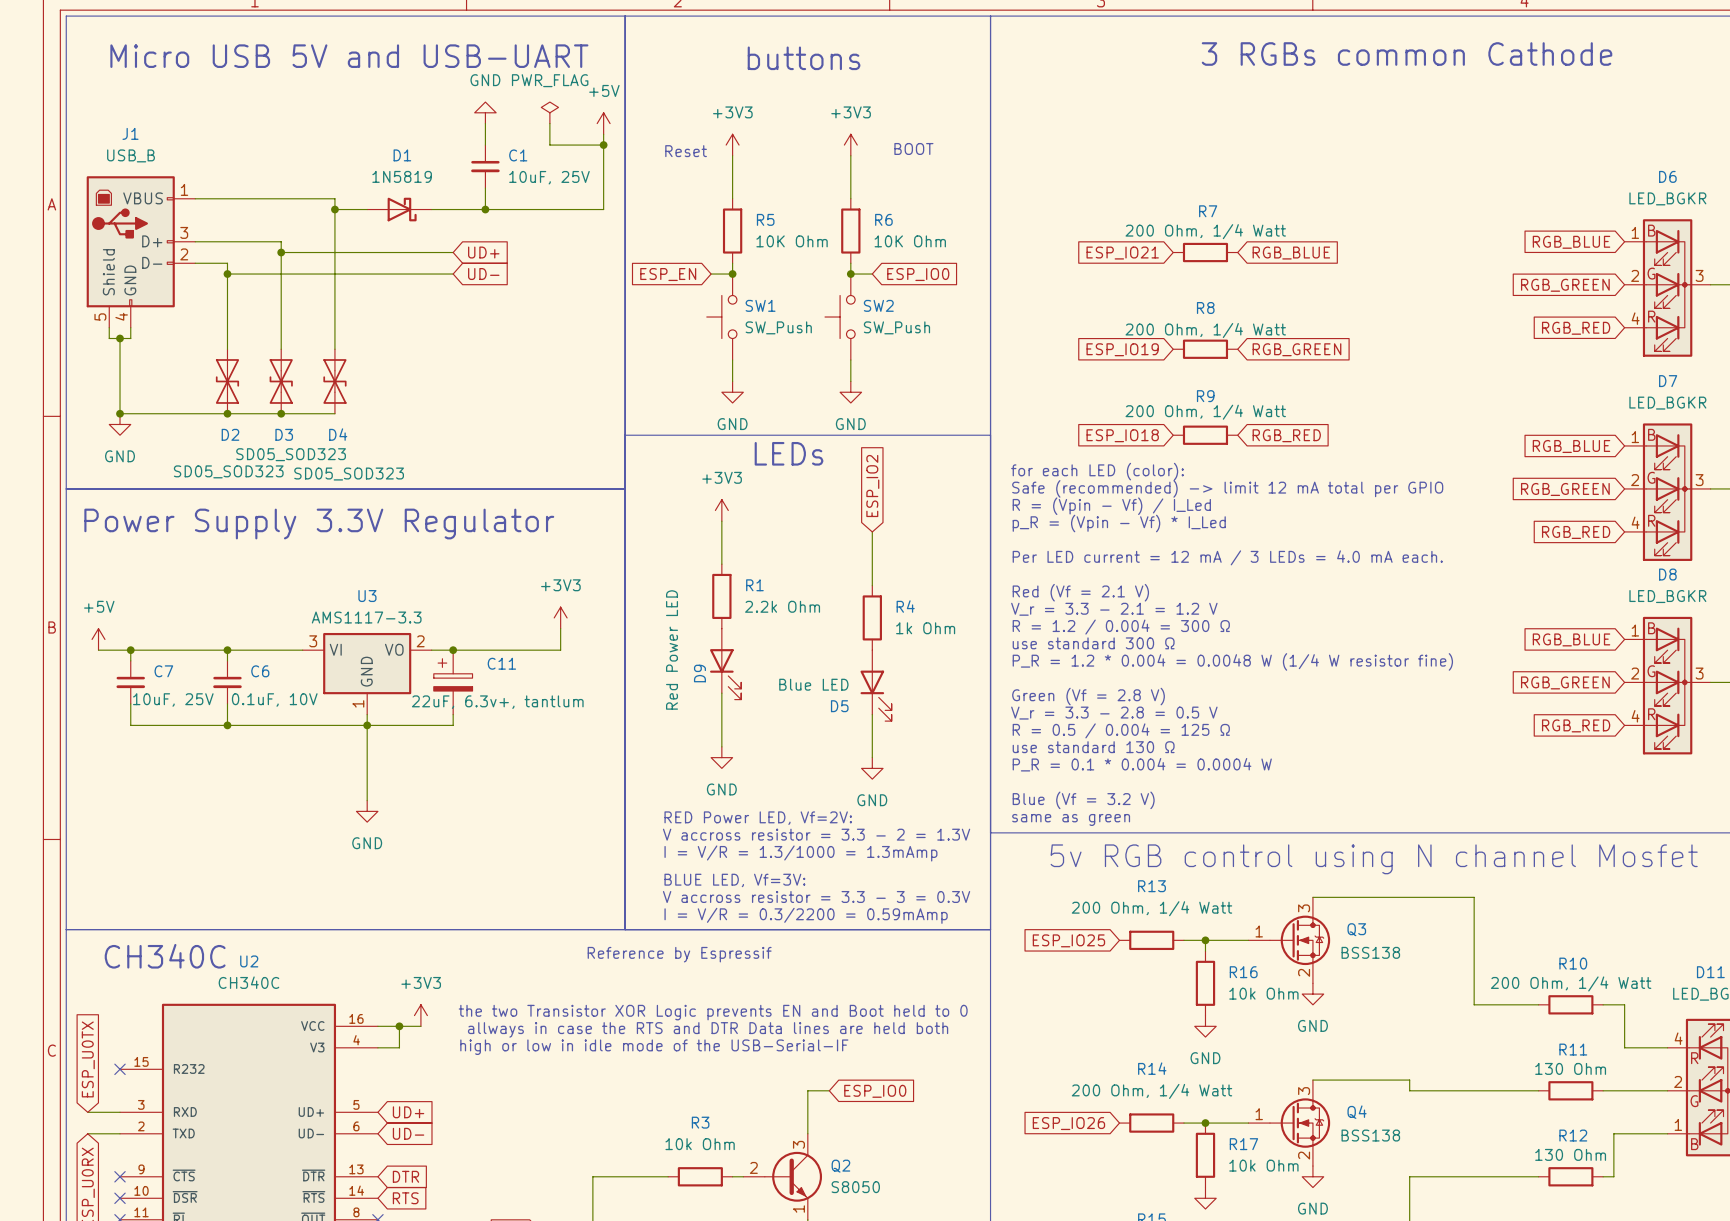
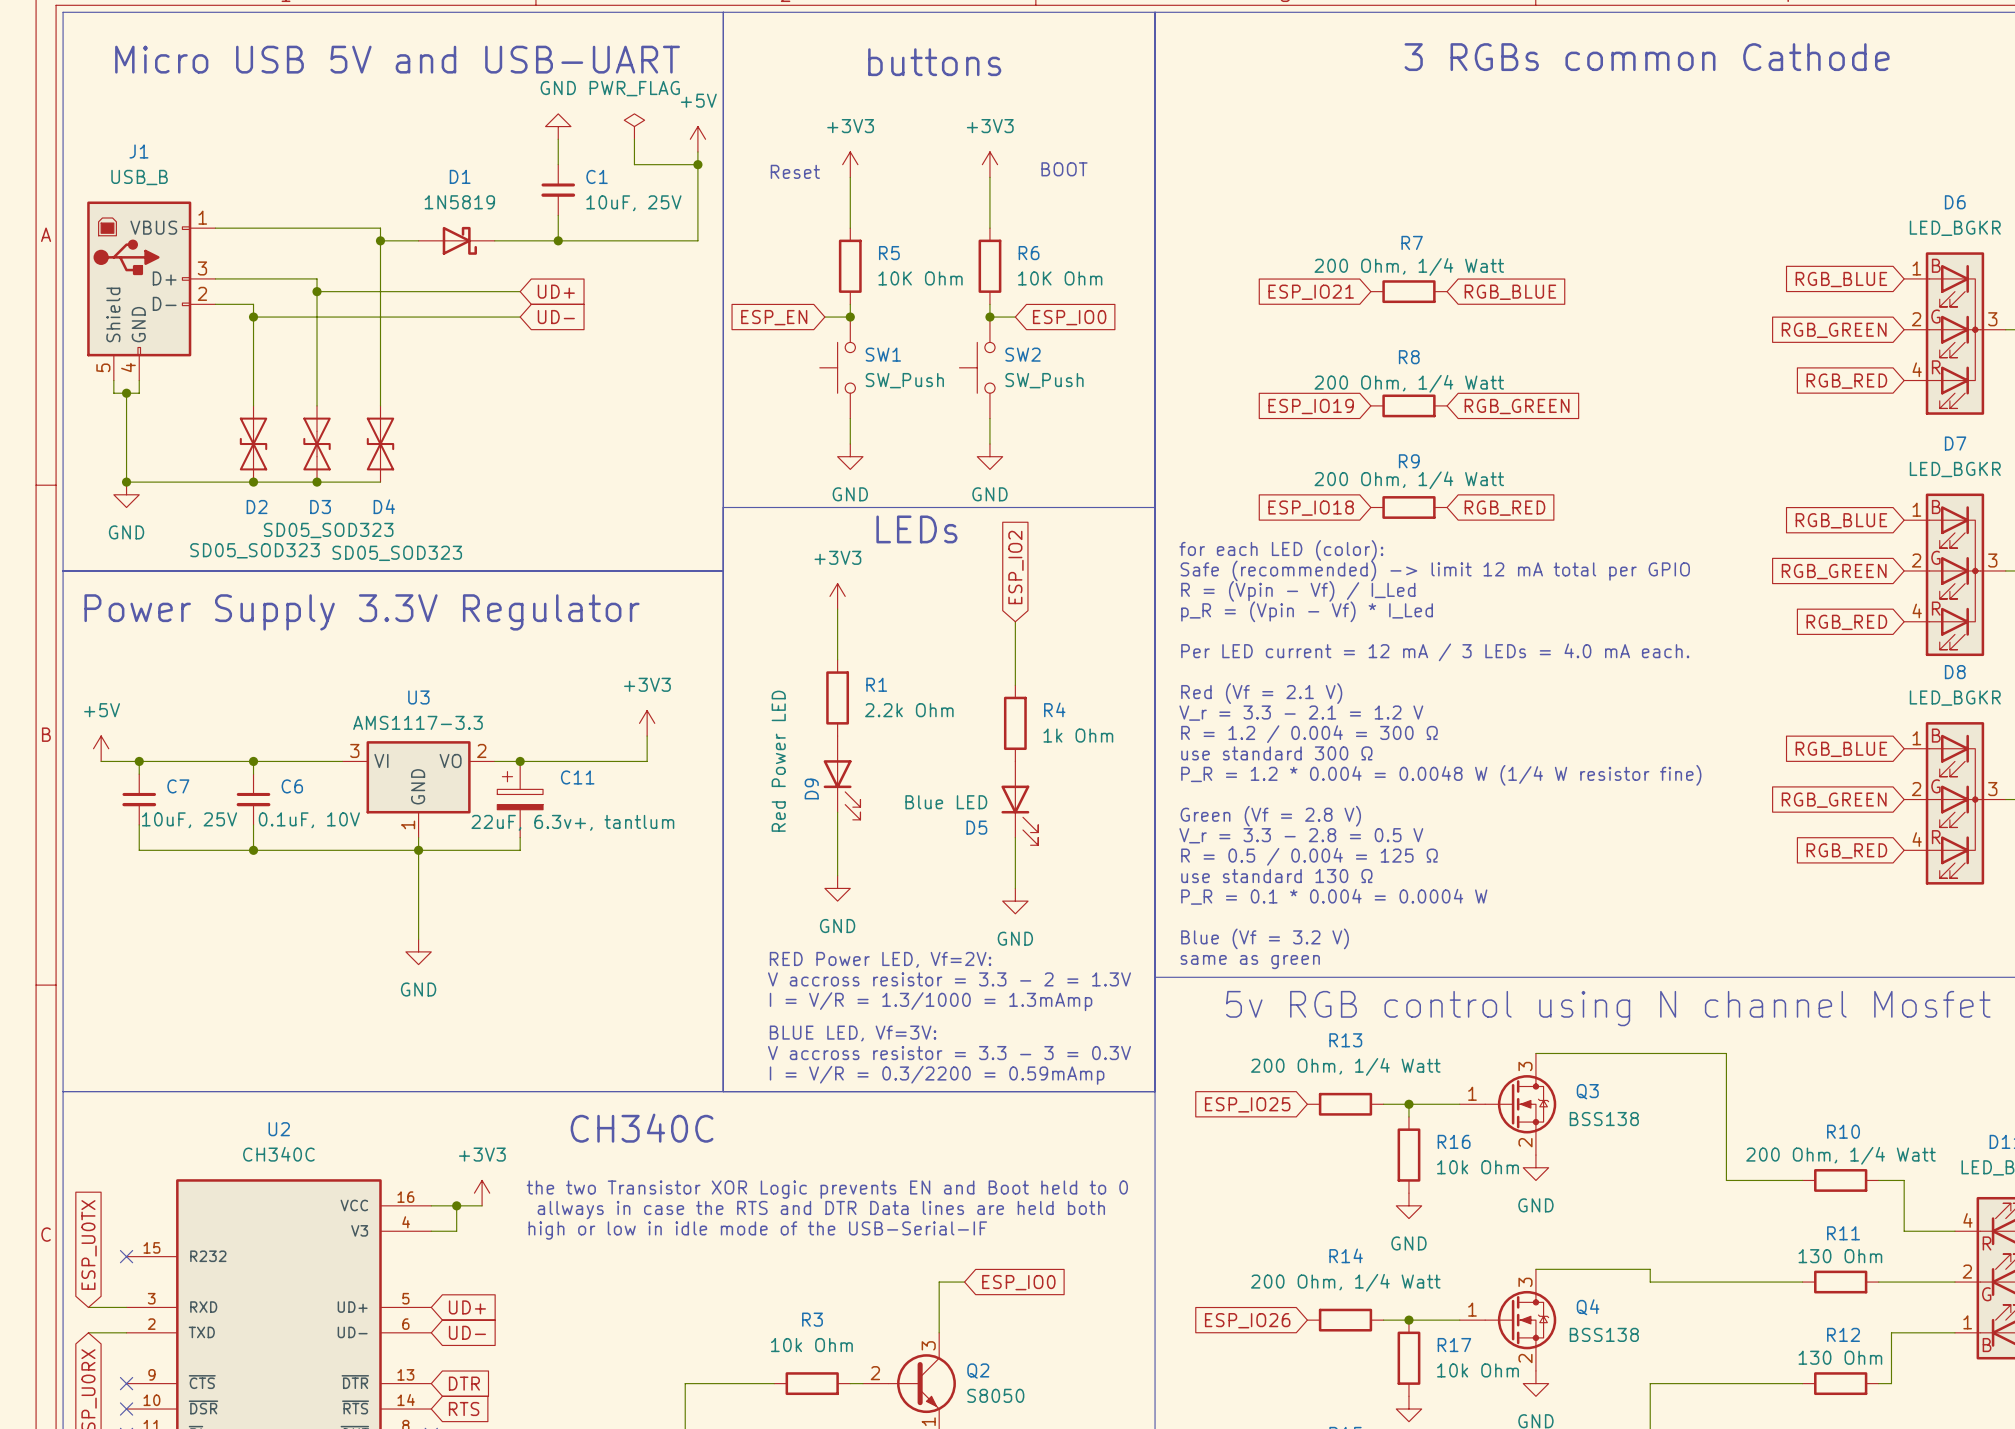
text: Reference by Espressif (679, 954) -> none
text: CH340C (165, 956) -> none
text: none -> CH340C (642, 1128)

